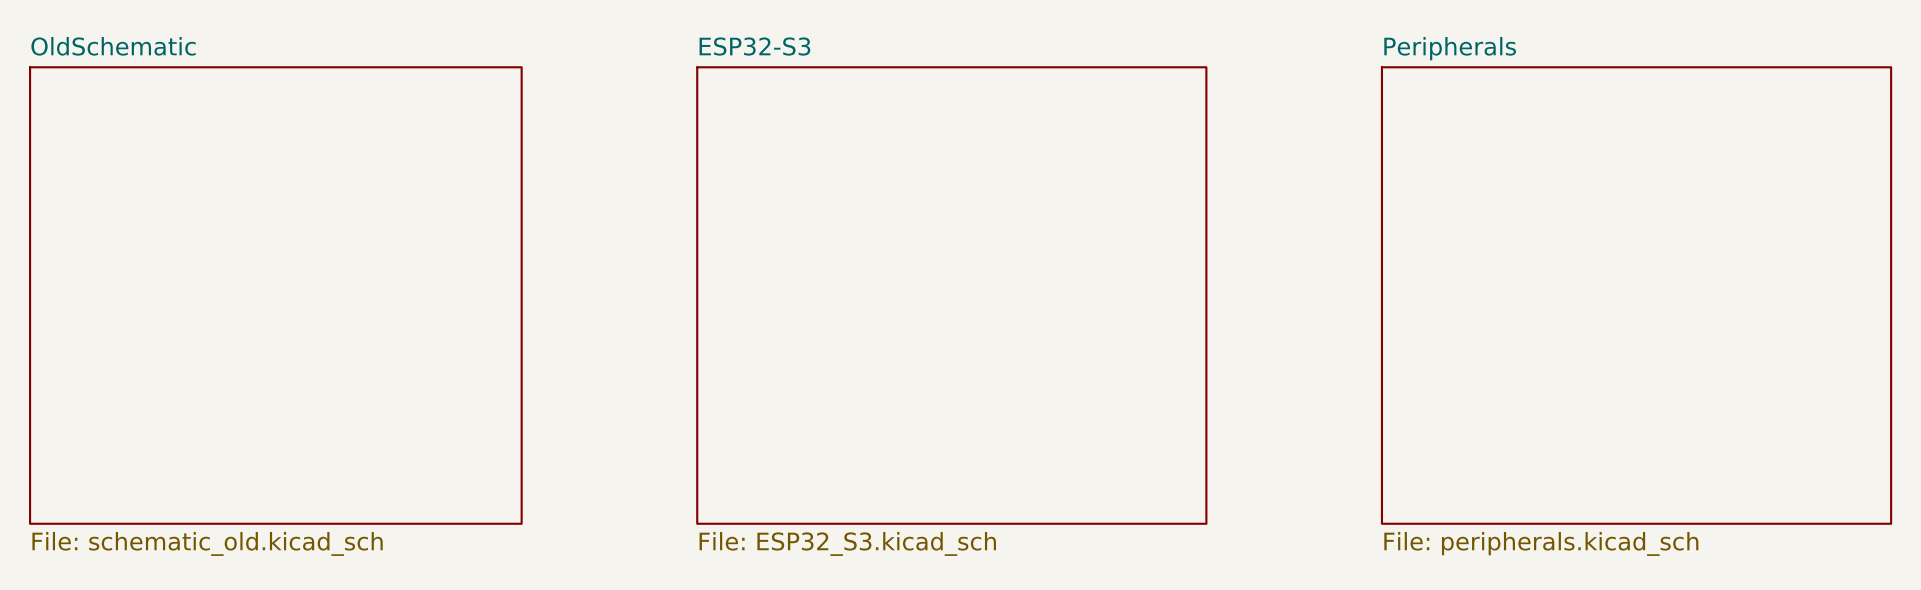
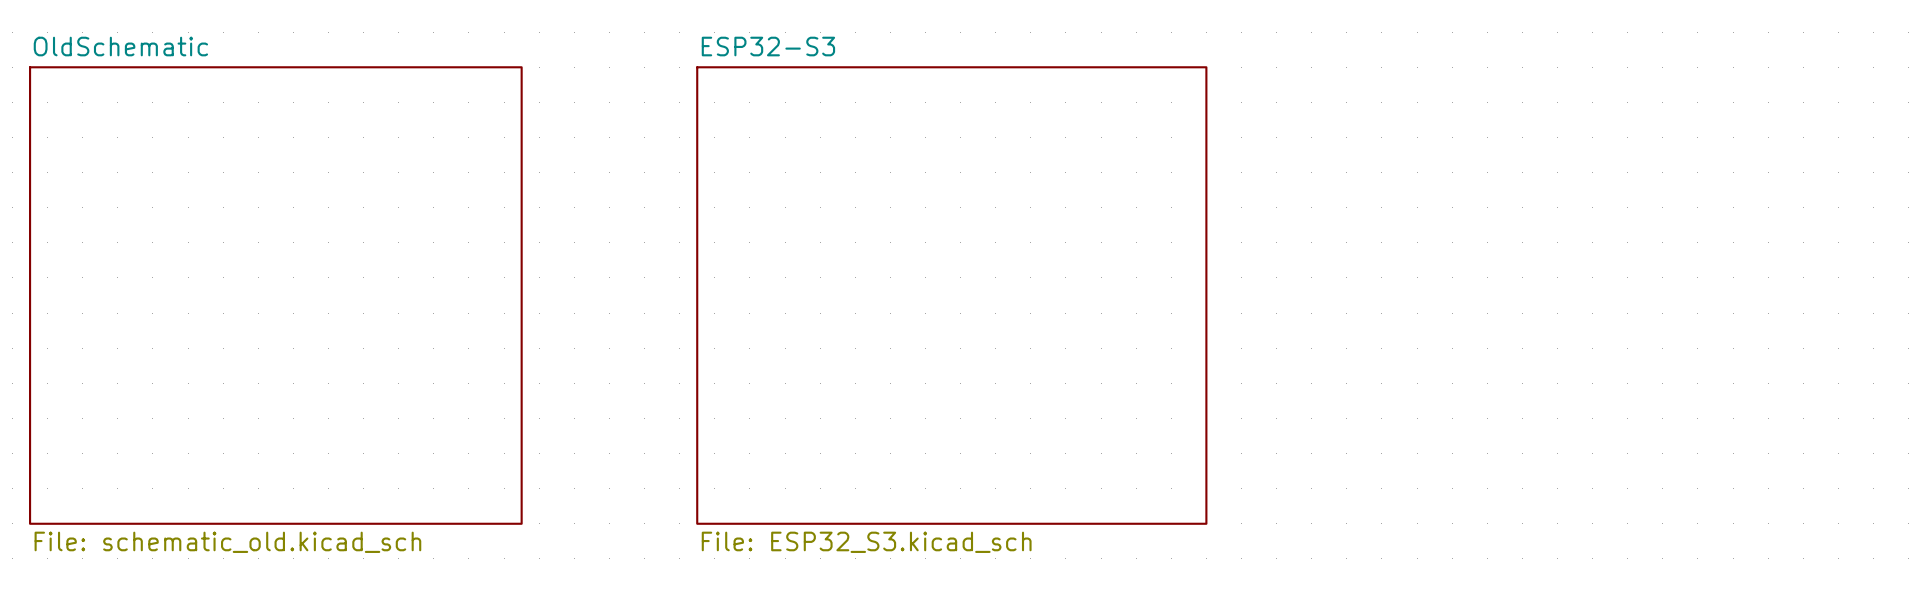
sheet Peripherals: File: peripherals.kicad_sch (1636, 295) -> none

